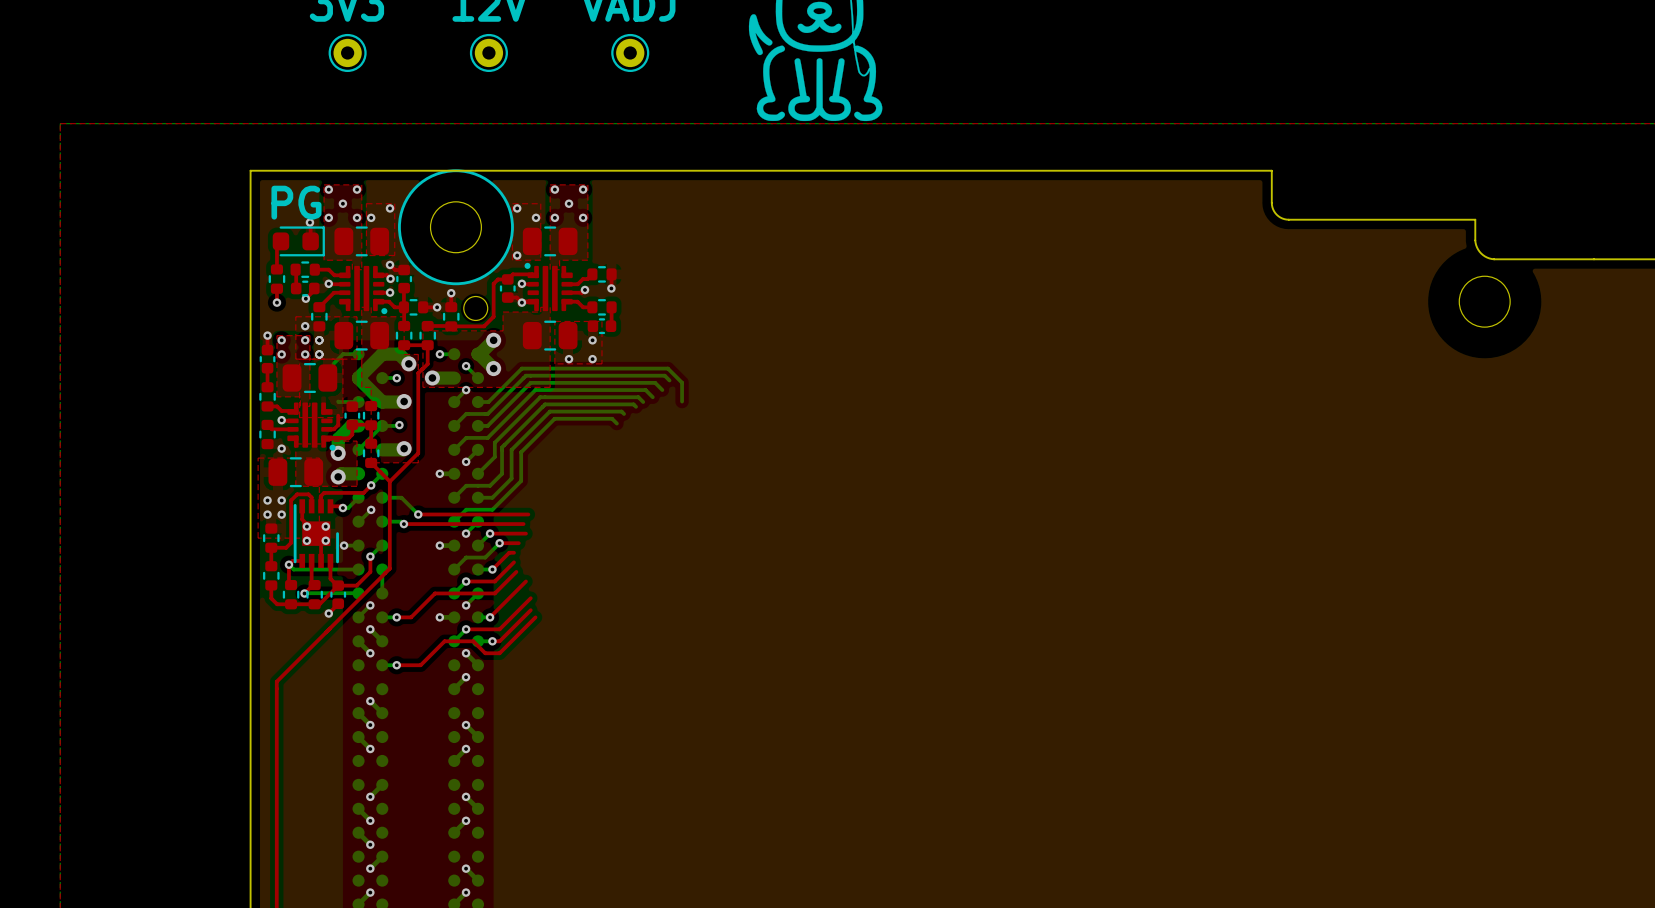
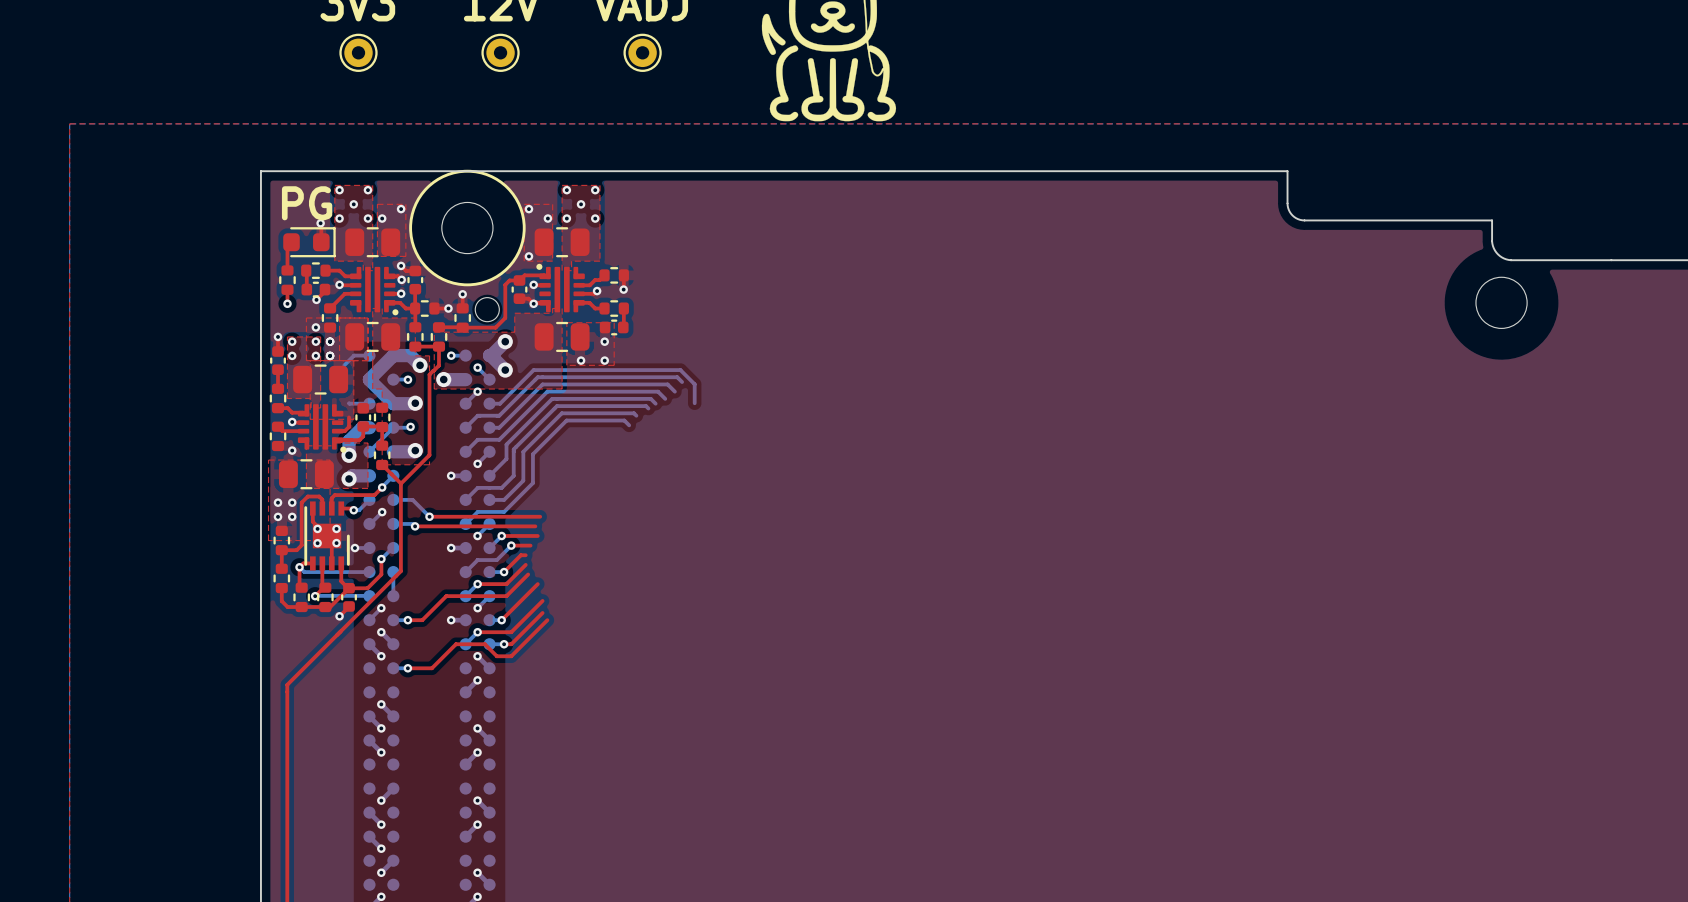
top zone outline: none -> (339, 317) (339, 360)

